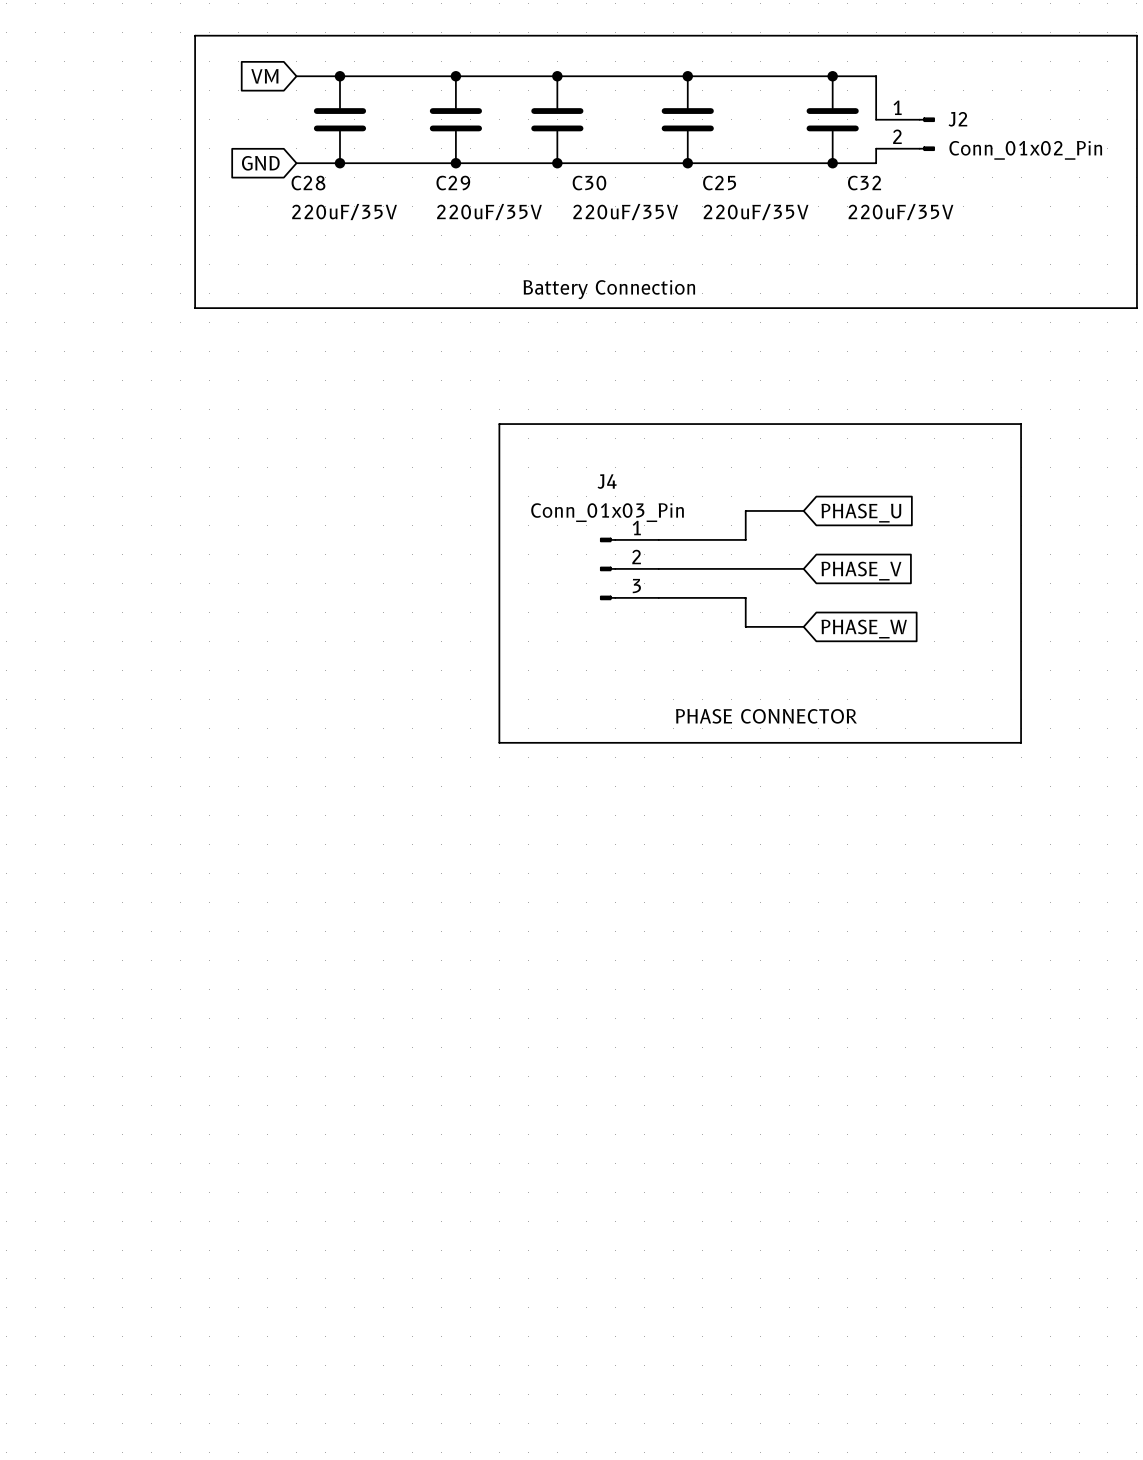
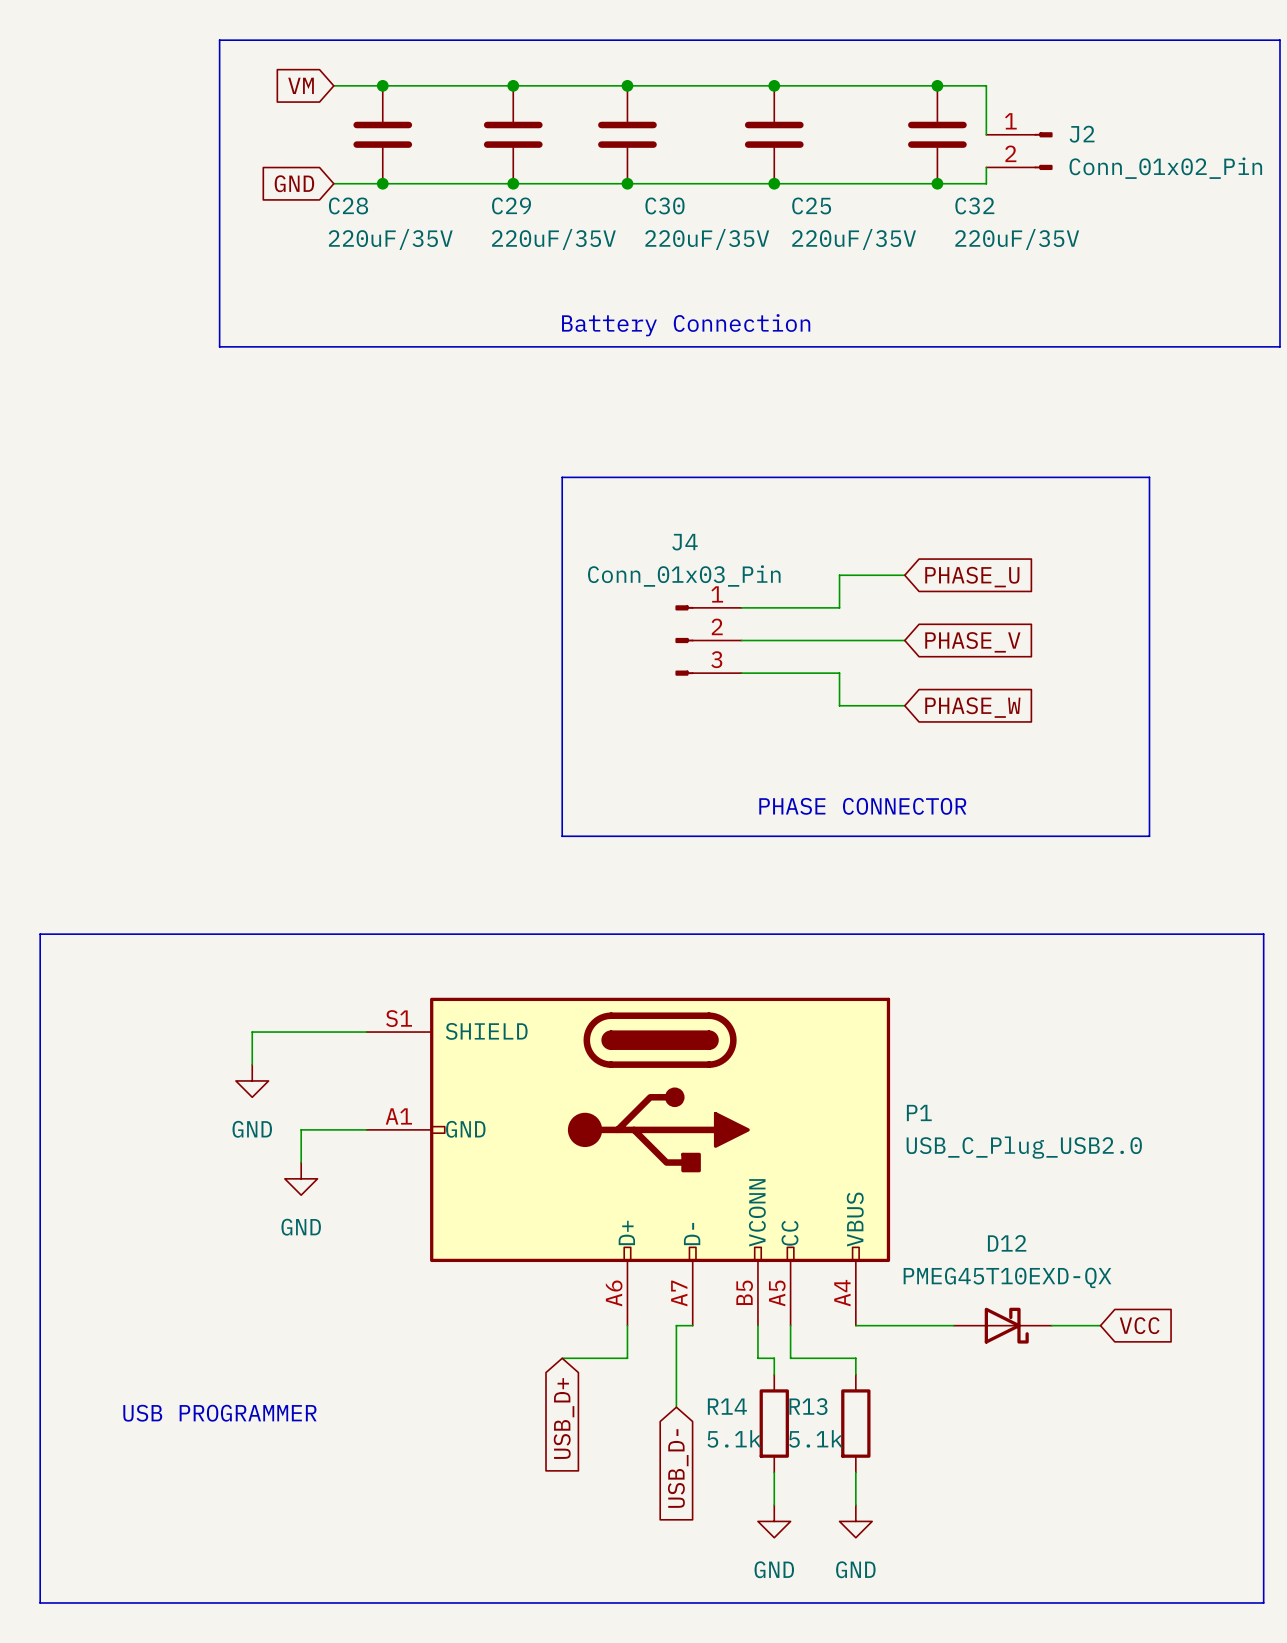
line: none -> (40, 934) (1263, 934) (1263, 1602) (40, 1602) (40, 934)
wire: none -> (366, 1032) (252, 1032) (252, 1064)
power symbol: none -> GND (252, 1080)
wire: none -> (366, 1129) (301, 1129) (301, 1162)
P1: none -> USB_C_Plug_USB2.0 (628, 1161)
power symbol: none -> GND (301, 1178)
wire: none -> (627, 1325) (627, 1358) (562, 1358)
wire: none -> (692, 1325) (676, 1325) (676, 1407)
wire: none -> (757, 1325) (757, 1358) (774, 1358) (774, 1374)
wire: none -> (790, 1325) (790, 1358) (855, 1358) (855, 1374)
wire: none -> (855, 1325) (953, 1325)
D12: none -> PMEG45T10EXD-QX (1002, 1325)
wire: none -> (1051, 1325) (1100, 1325)
global label: none -> VCC (1139, 1325)
text: none -> USB PROGRAMMER (219, 1413)
global label: none -> USB_D+ (564, 1418)
R14: none -> 5.1k (774, 1423)
R13: none -> 5.1k (855, 1423)
global label: none -> USB_D- (678, 1468)
wire: none -> (774, 1472) (774, 1505)
wire: none -> (855, 1472) (855, 1505)
power symbol: none -> GND (774, 1521)
power symbol: none -> GND (855, 1521)

